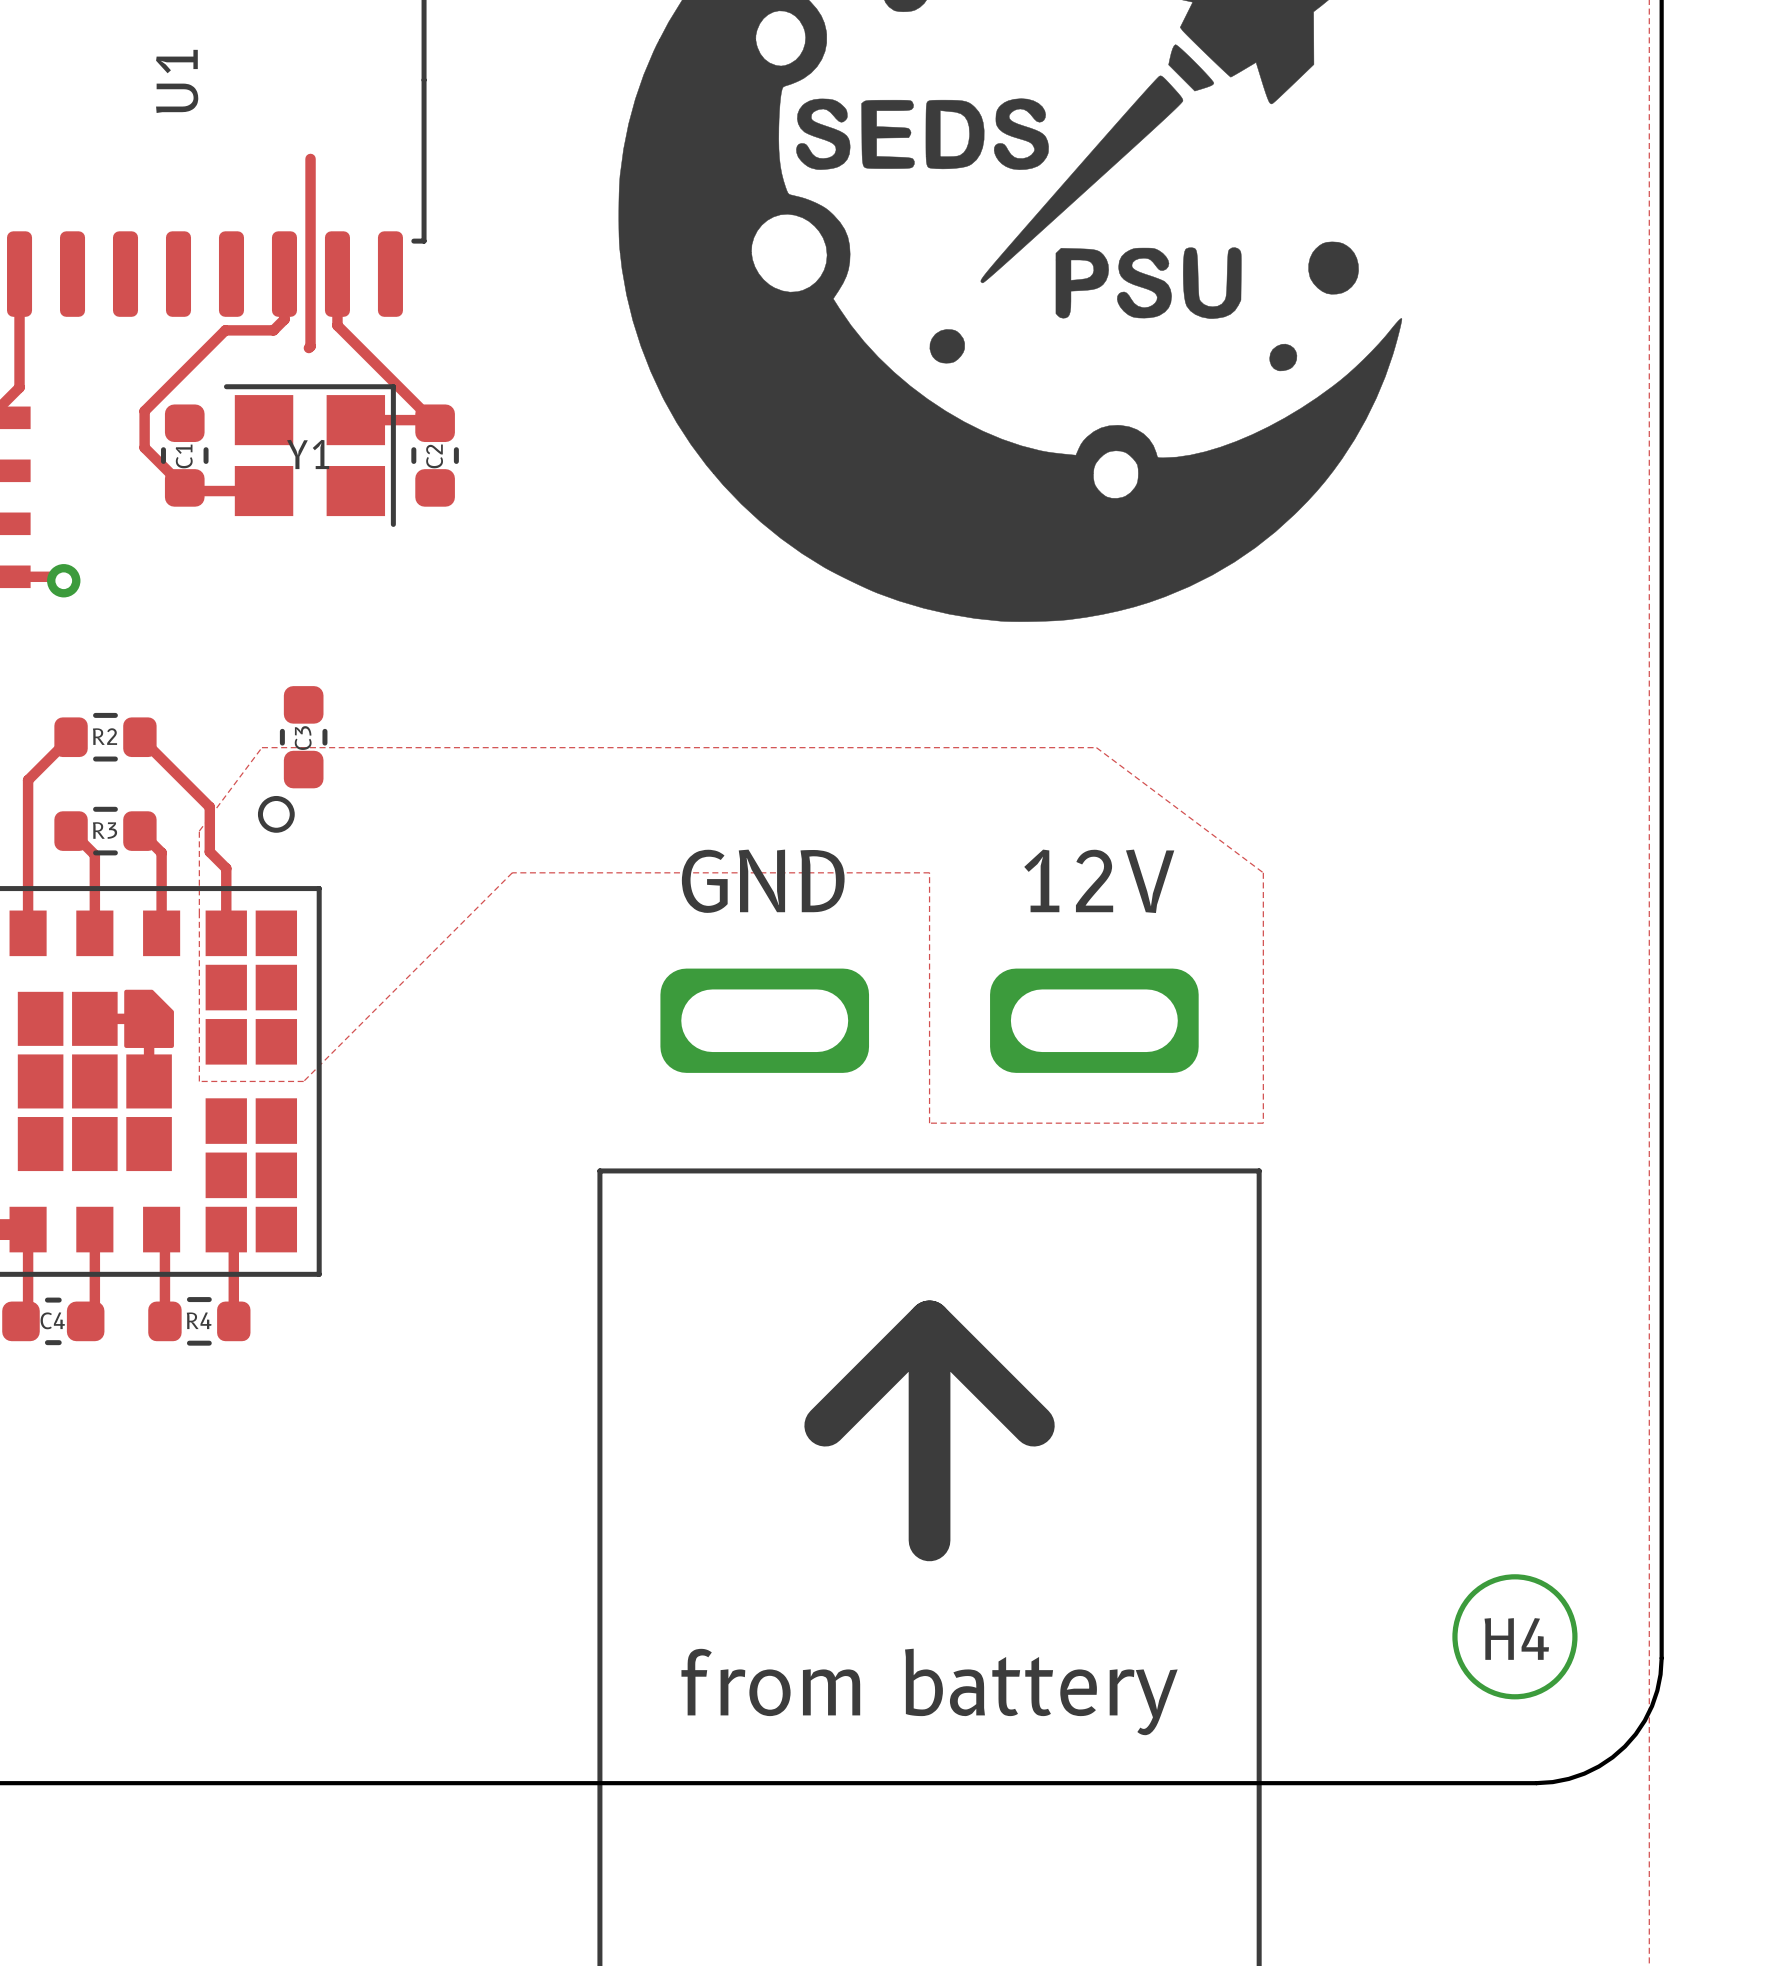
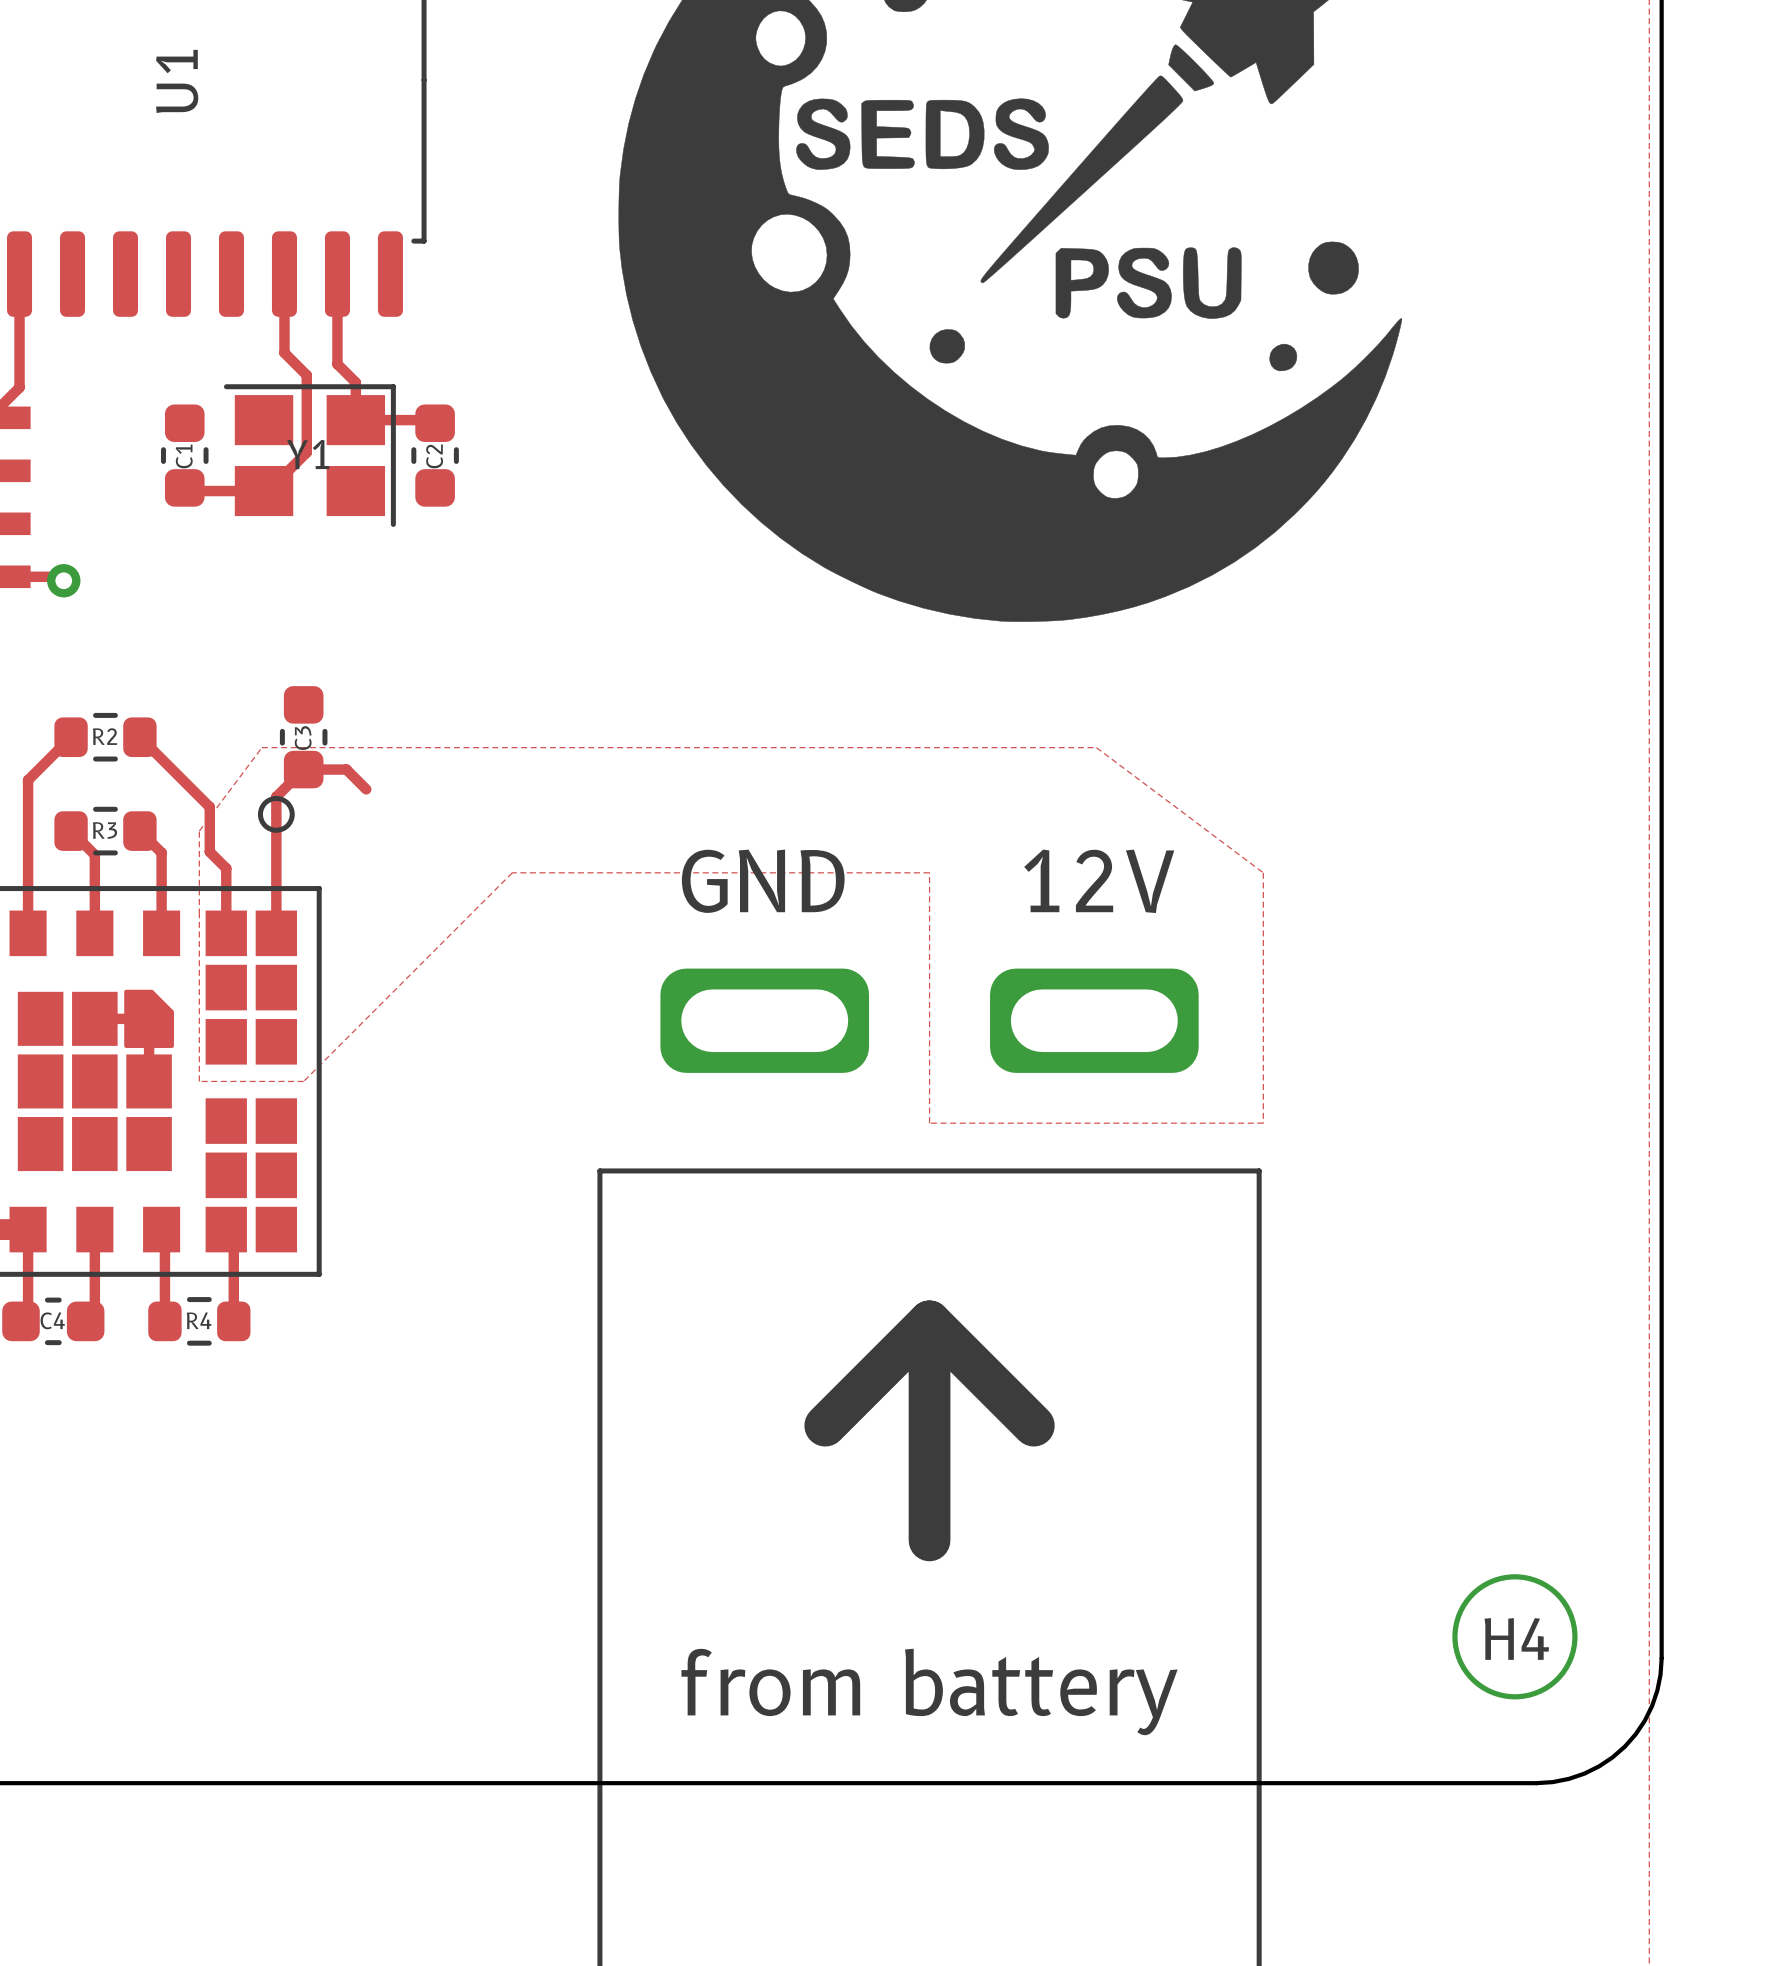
track: (310, 158) (310, 346) (308, 348) -> none
track: (284, 319) (273, 330) (225, 330) (144, 411) (144, 447) (184, 487) -> (284, 319) (284, 352) (306, 375) (306, 452) (268, 491) (264, 491)
track: (337, 325) (431, 420) -> (337, 325) (337, 364) (355, 382) (355, 420)
track: none -> (366, 789) (346, 769) (303, 769) (276, 796) (276, 933)

